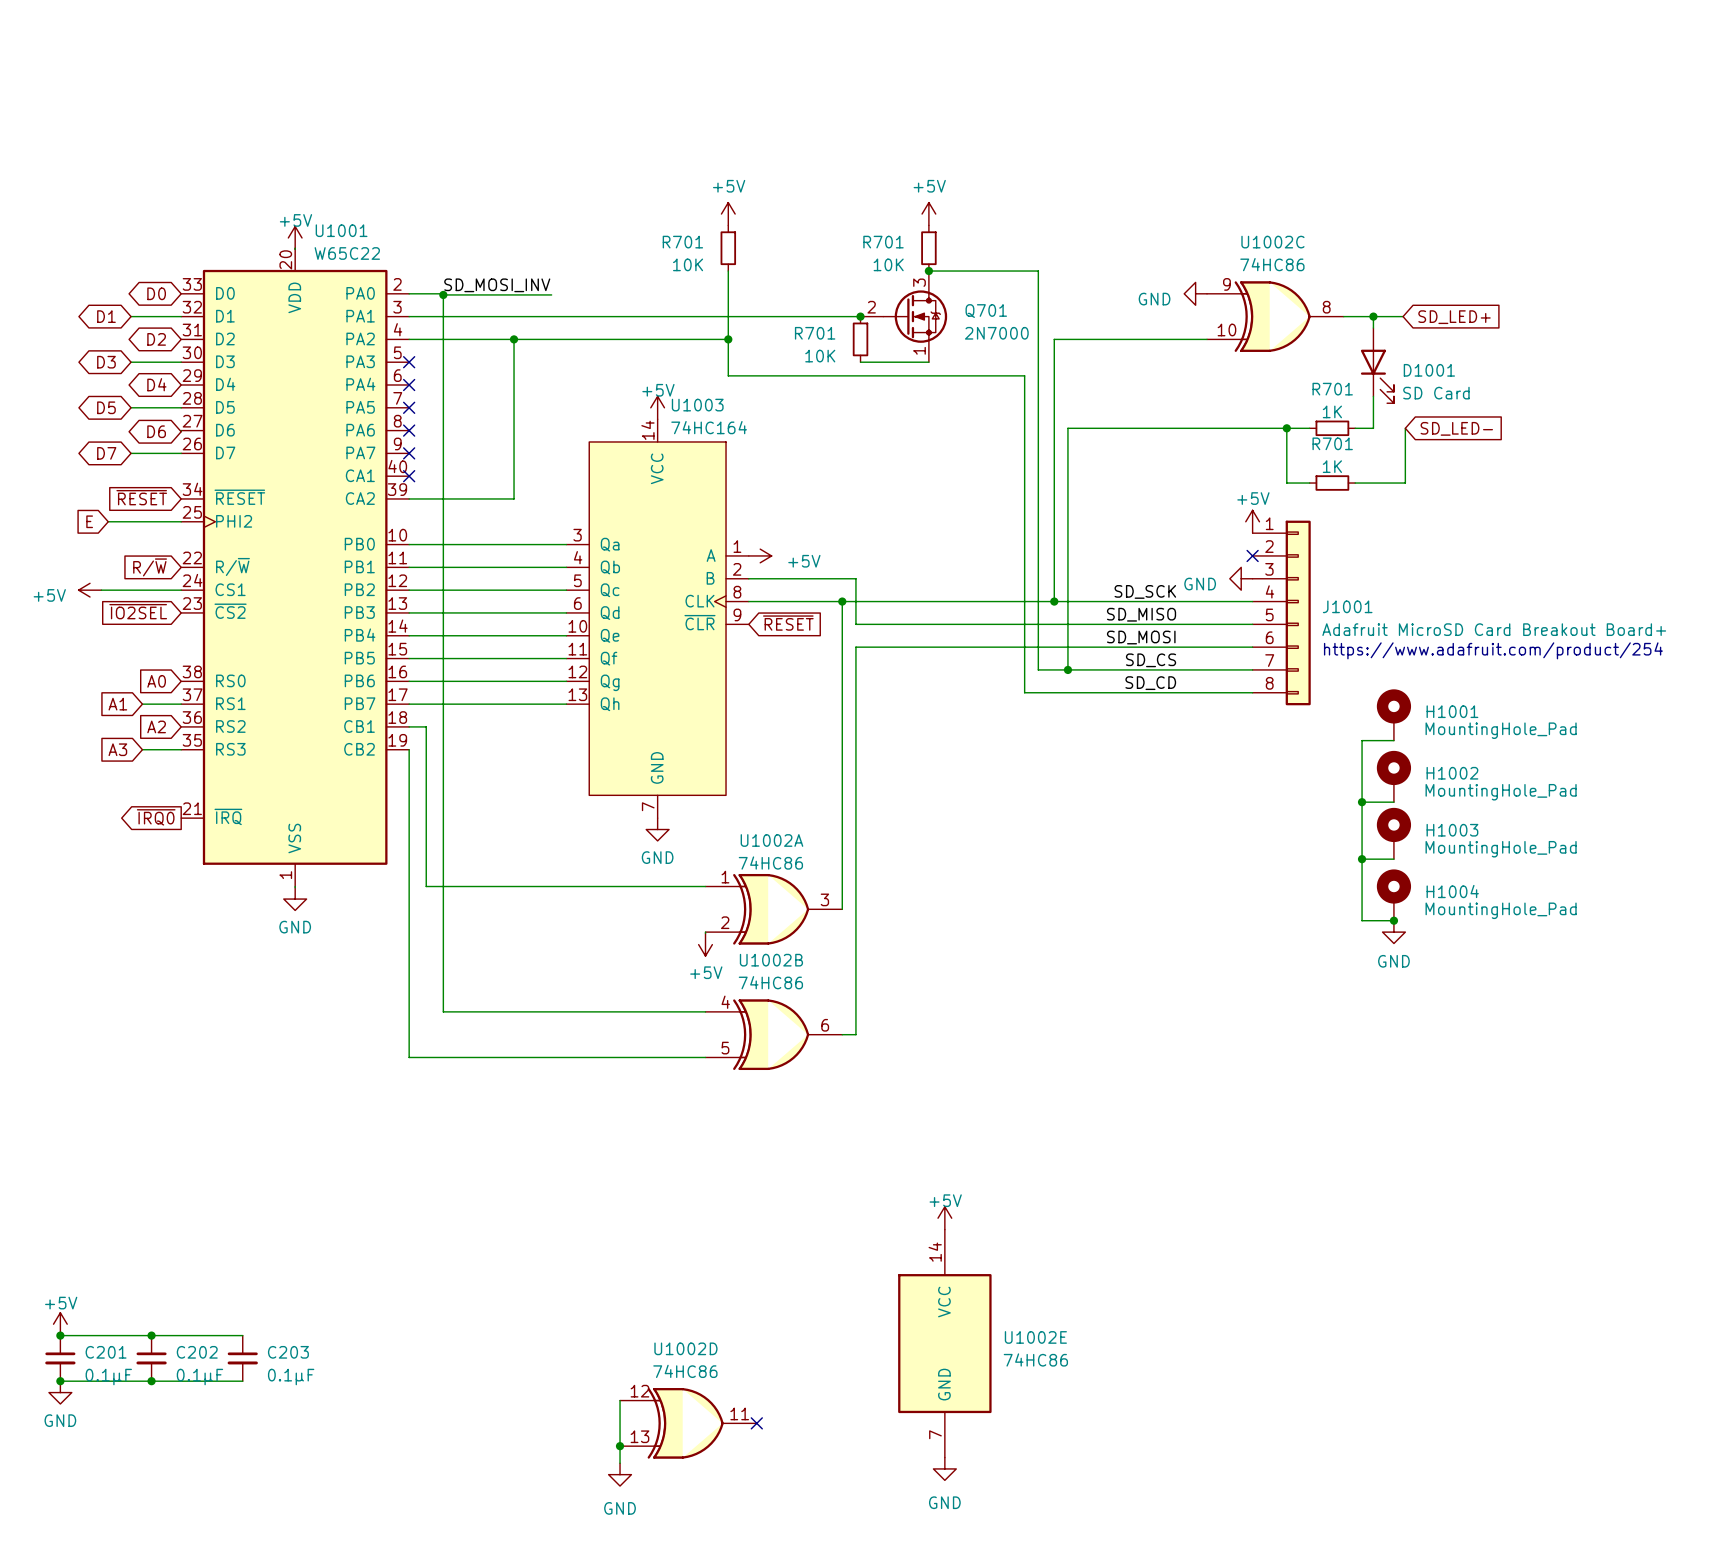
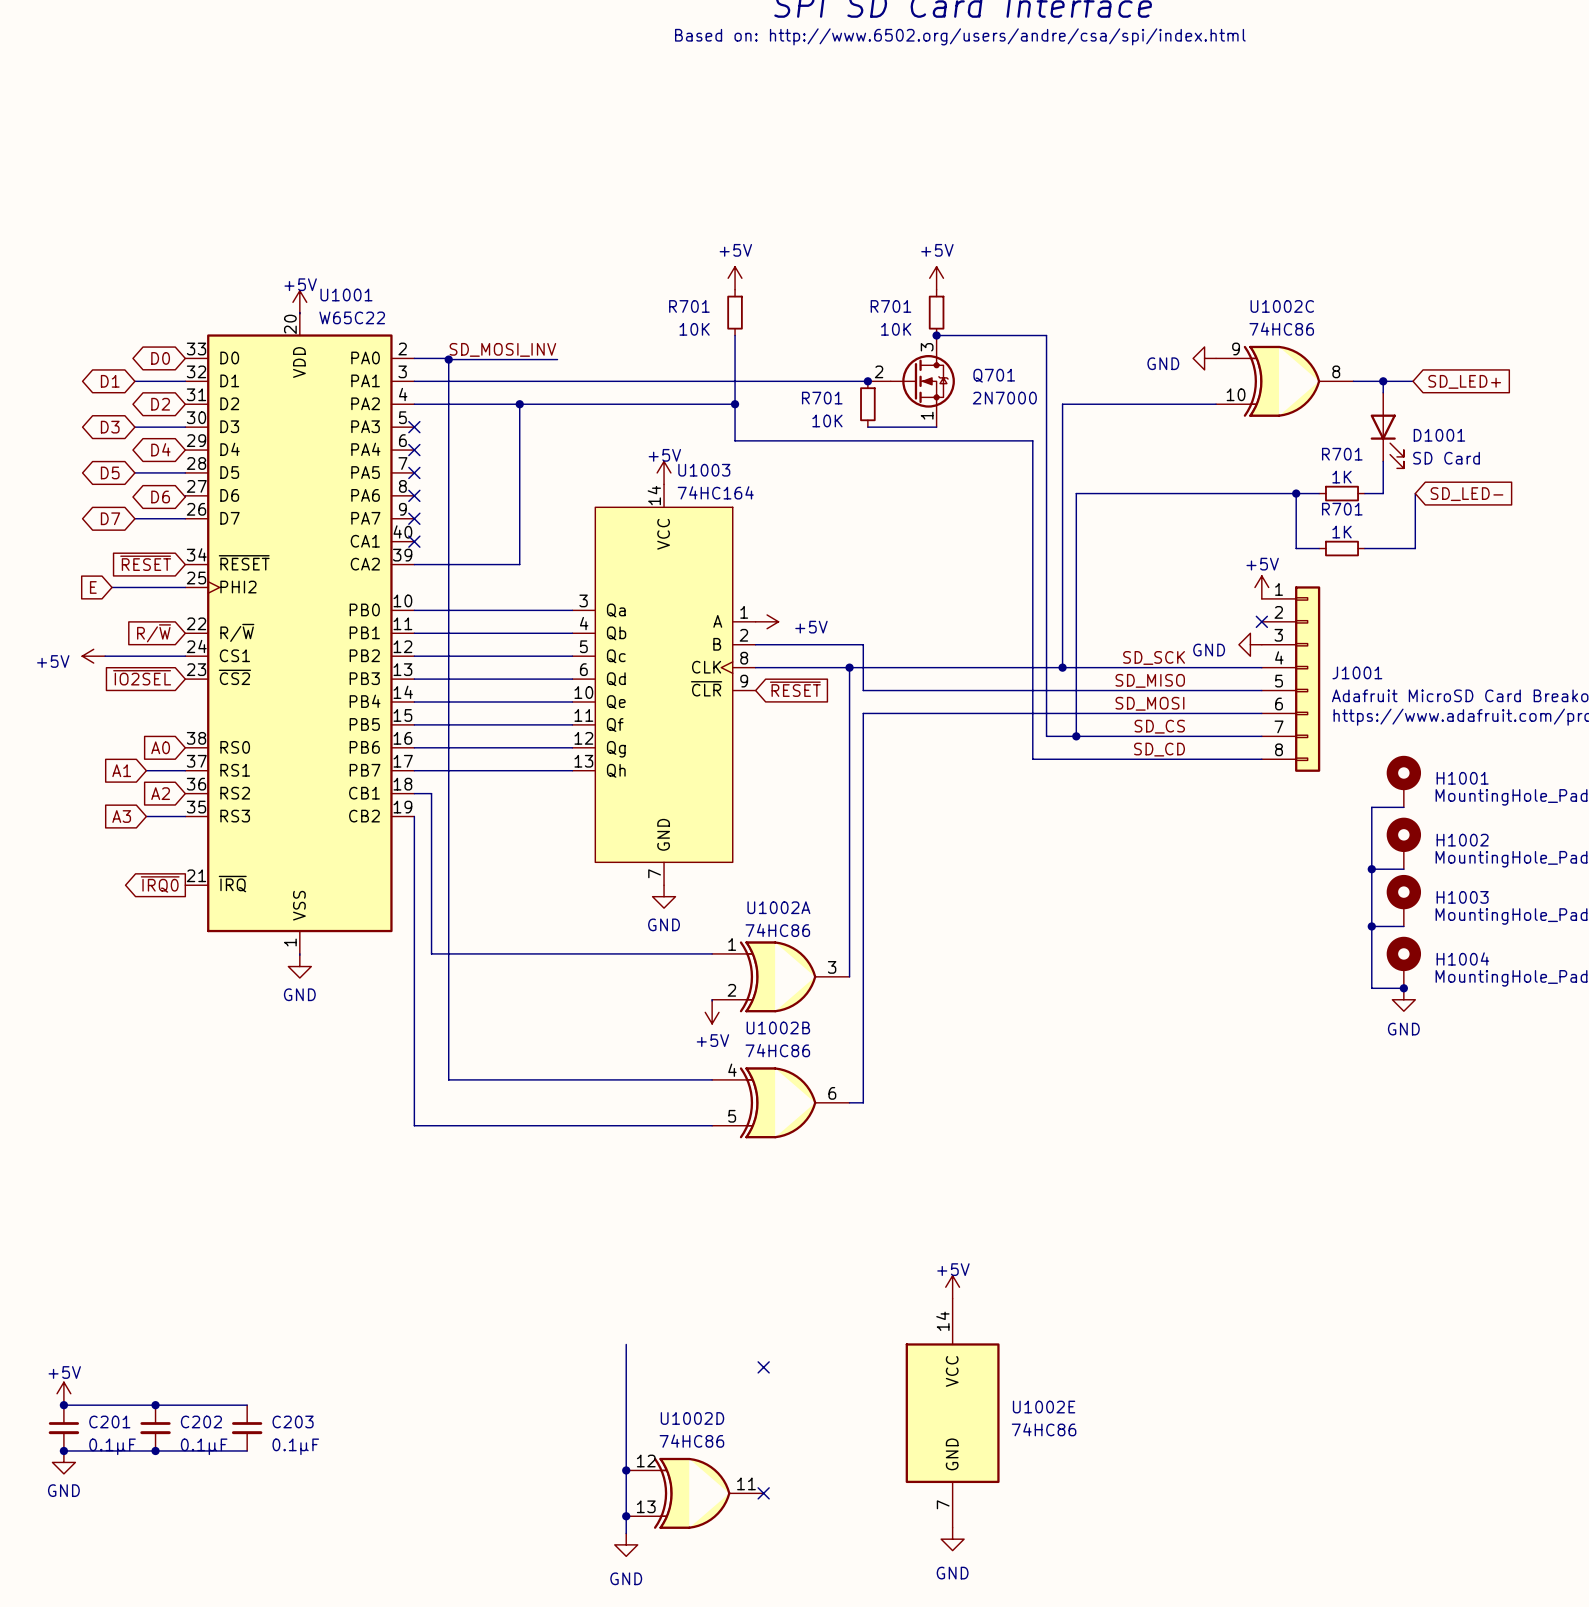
wire: none -> (626, 1344) (626, 1470)
no-connect mark: none -> (763, 1367)
junction: none -> (626, 1470)

